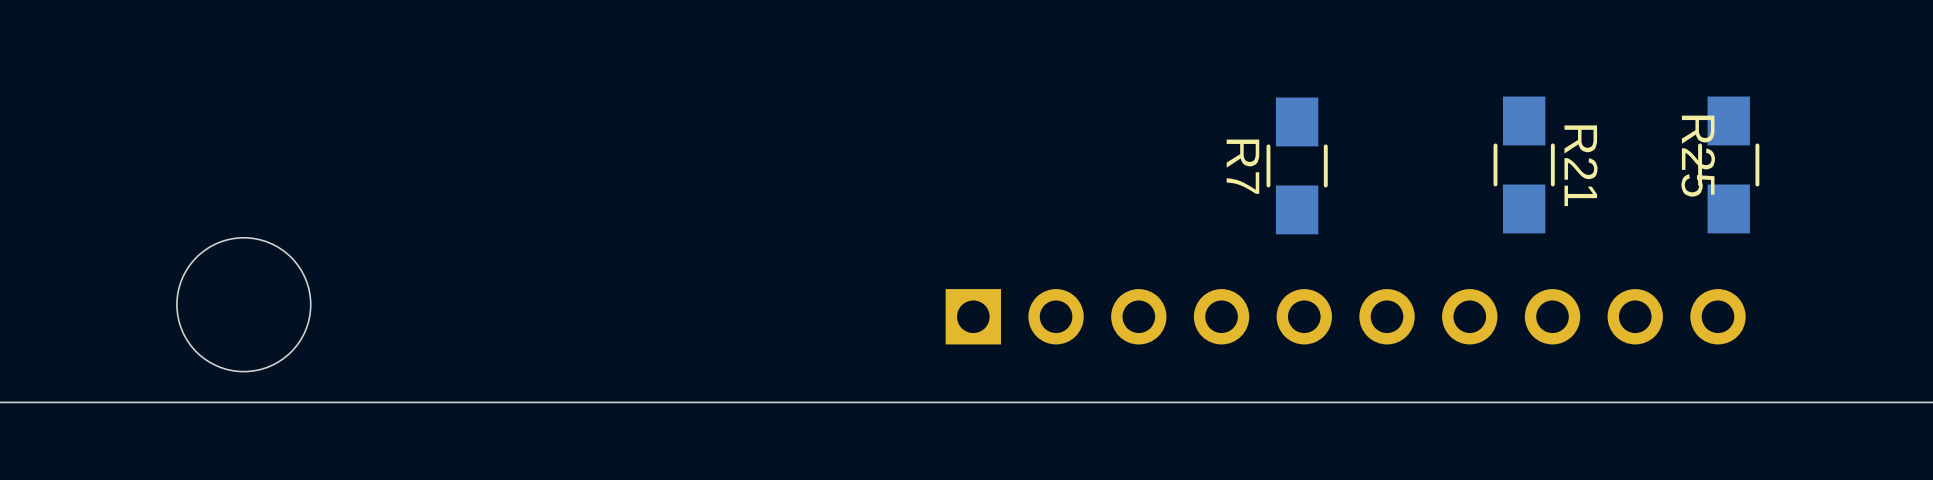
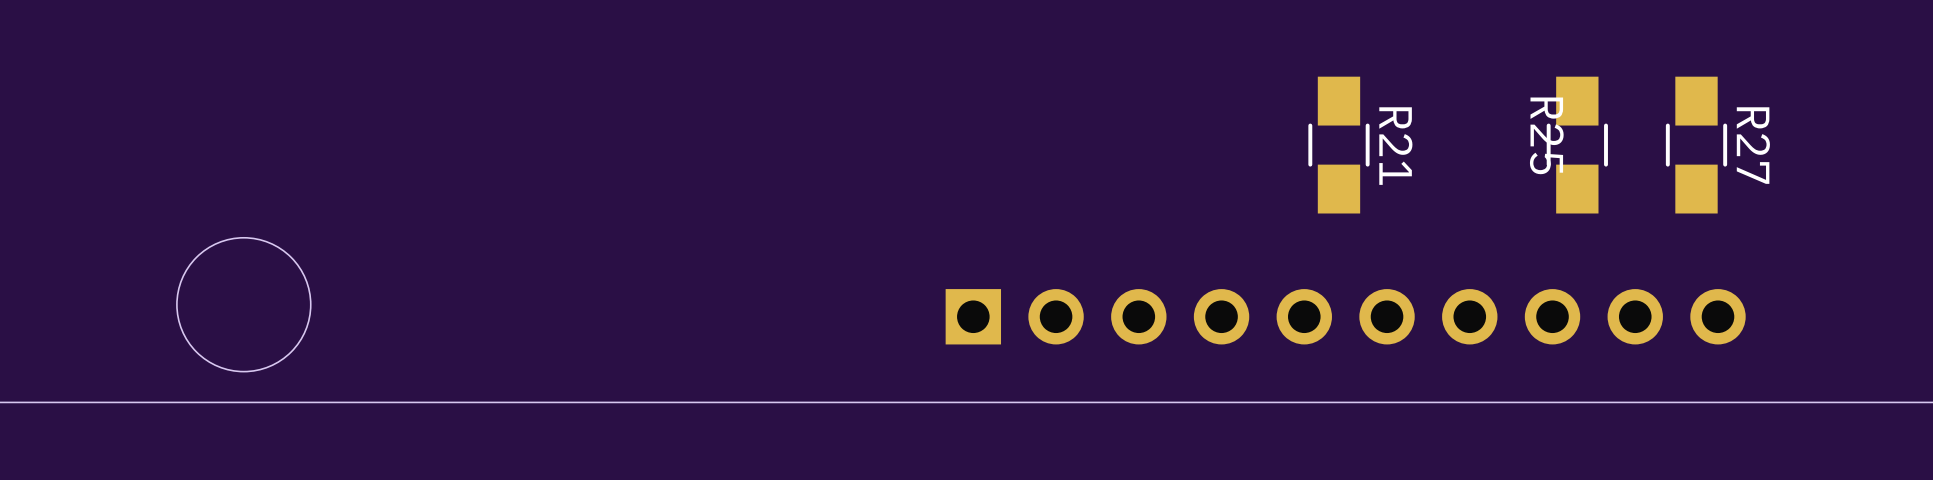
R27: none -> (1696, 145)
R21 position: (1524, 164) -> (1338, 145)
R25 position: (1728, 164) -> (1577, 145)
R7: (1297, 165) -> none

